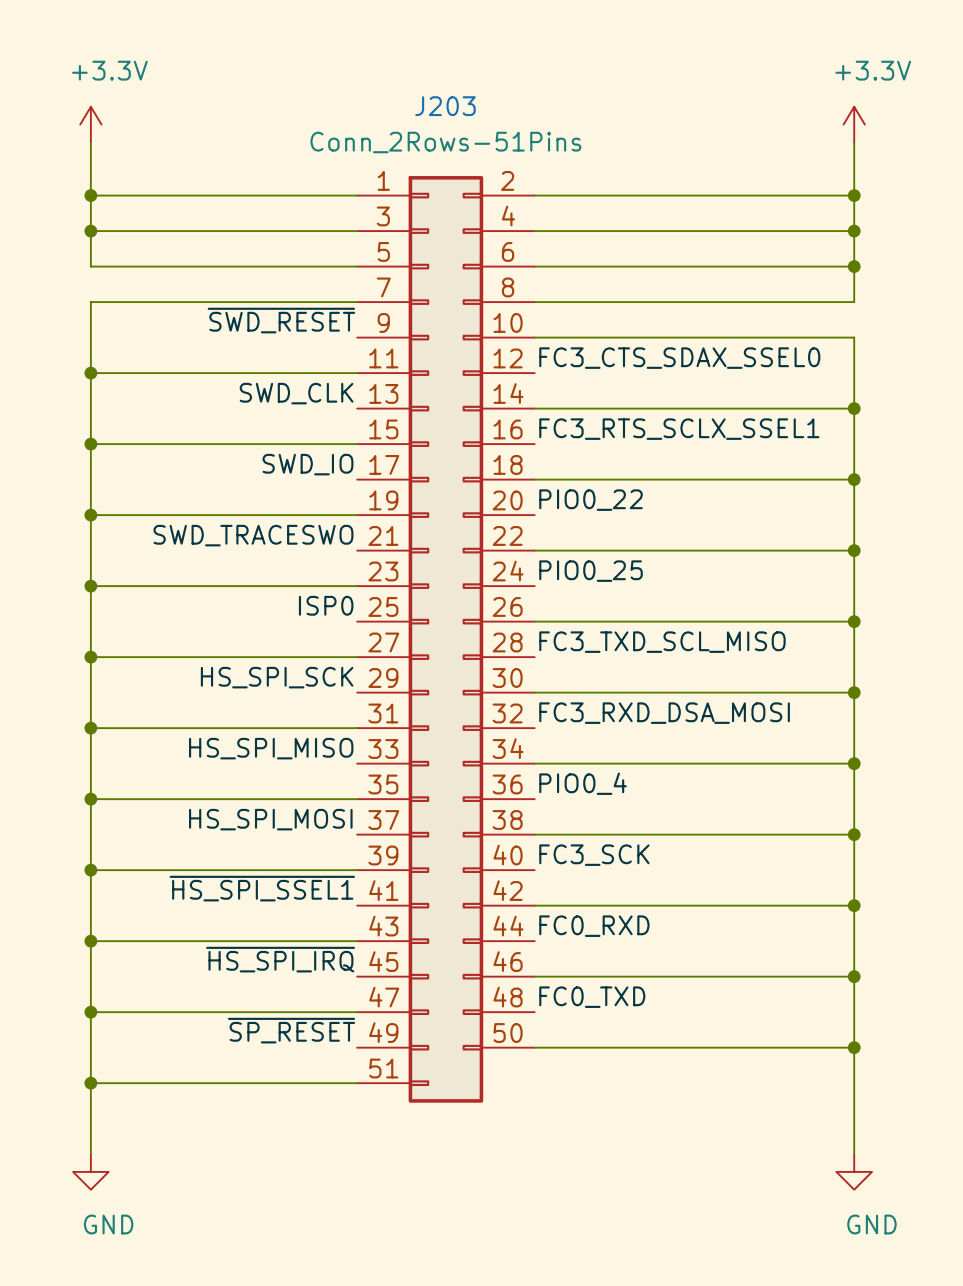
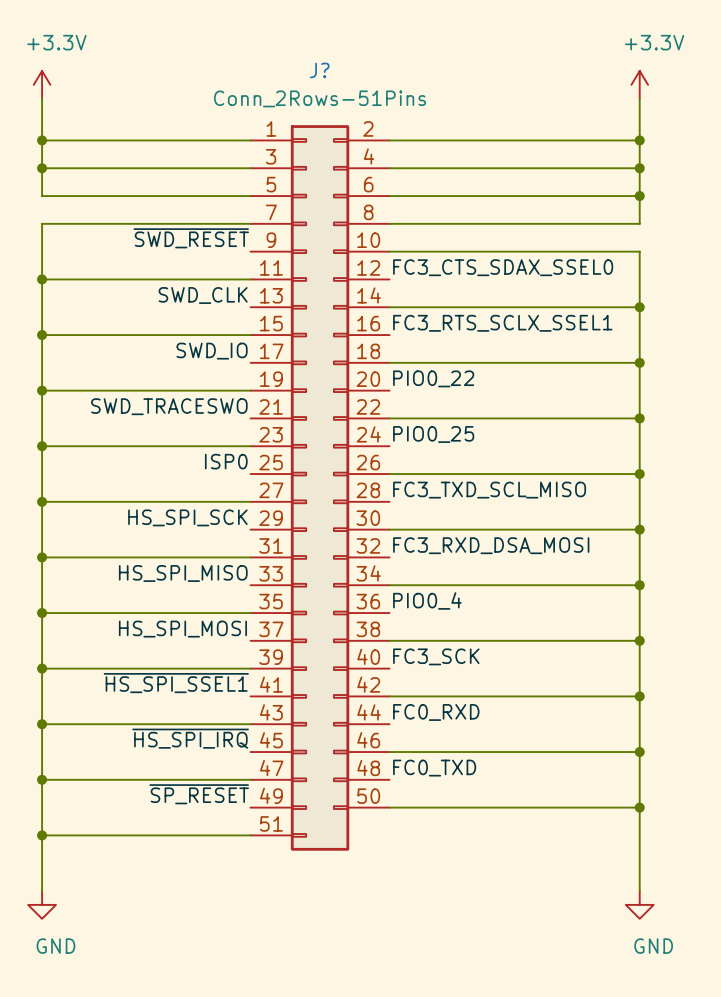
J203 name: J203 (445, 106) -> J? (319, 70)

